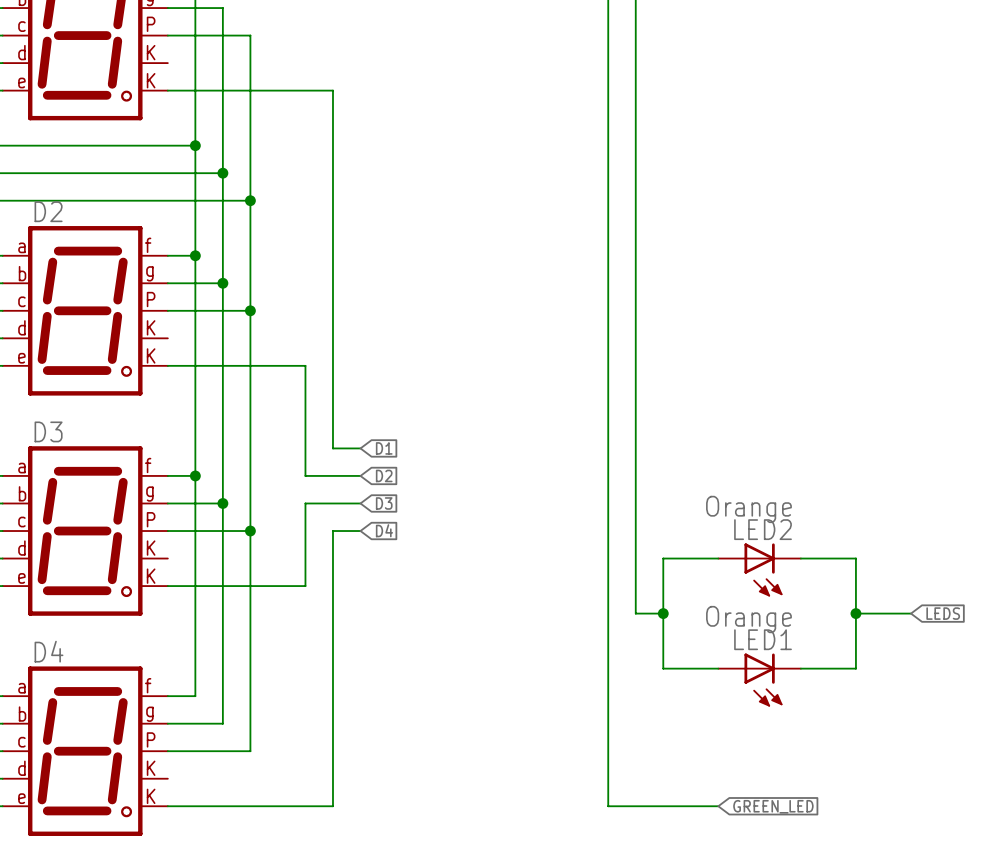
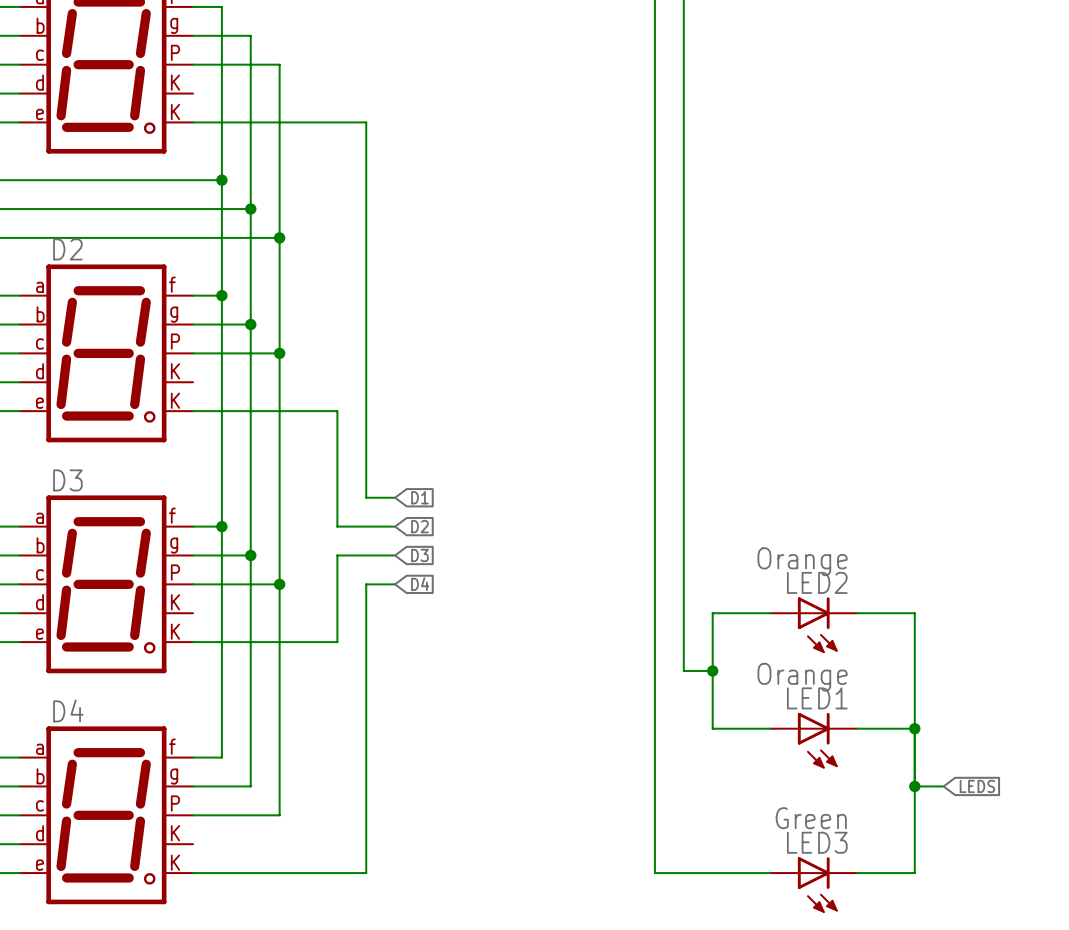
wire: (855, 613) (911, 613) -> none
junction: (855, 613) -> none
global label position: LEDS (943, 613) -> LEDS (977, 786)
wire: none -> (914, 728) (914, 873) (857, 873)
junction: none -> (914, 728)
wire: none -> (914, 786) (943, 786)
junction: none -> (914, 786)
global label: GREEN_LED (773, 806) -> none
LED3: none -> Green (813, 885)

